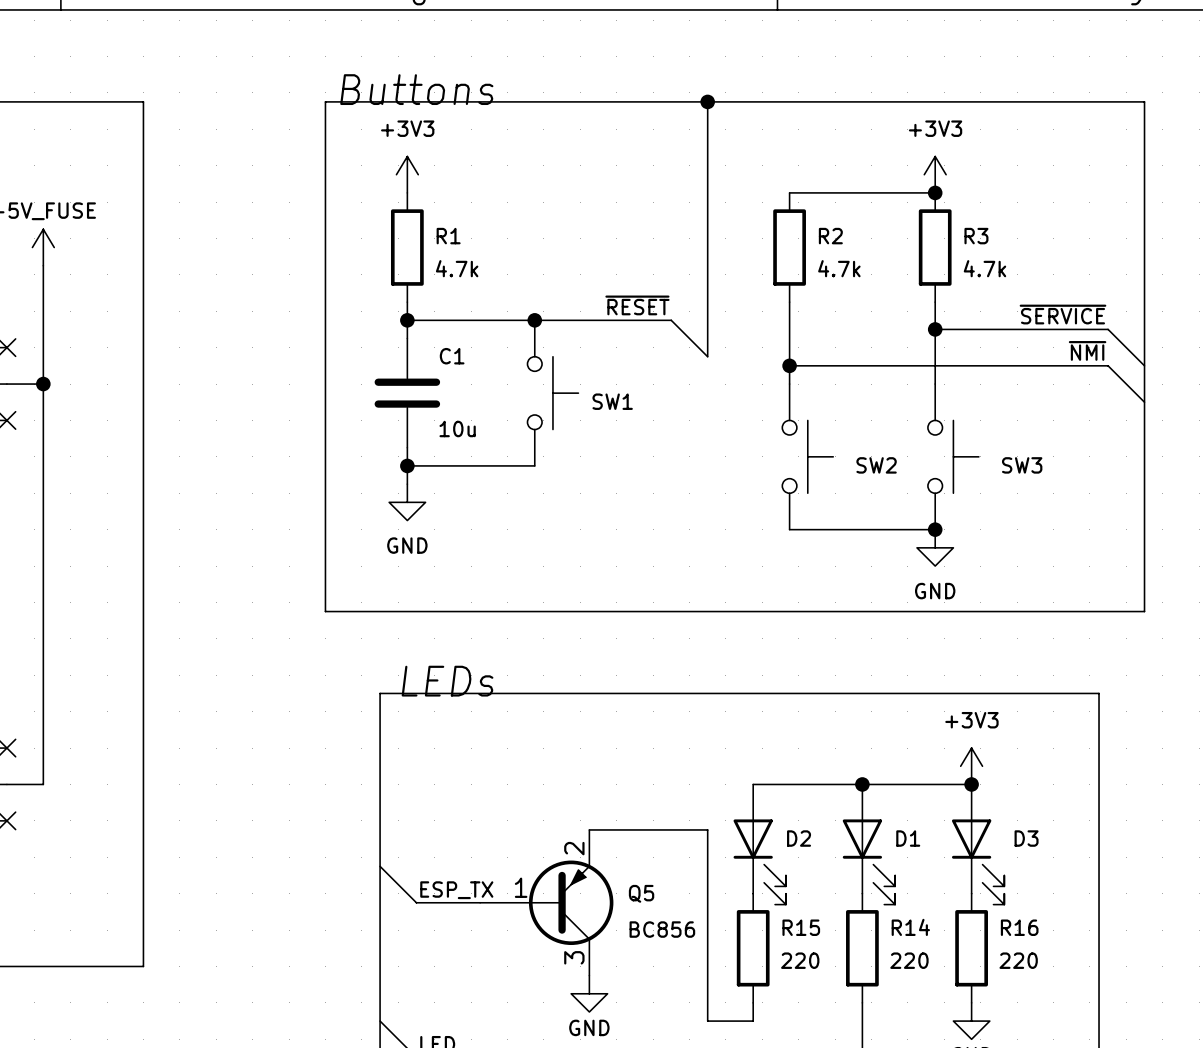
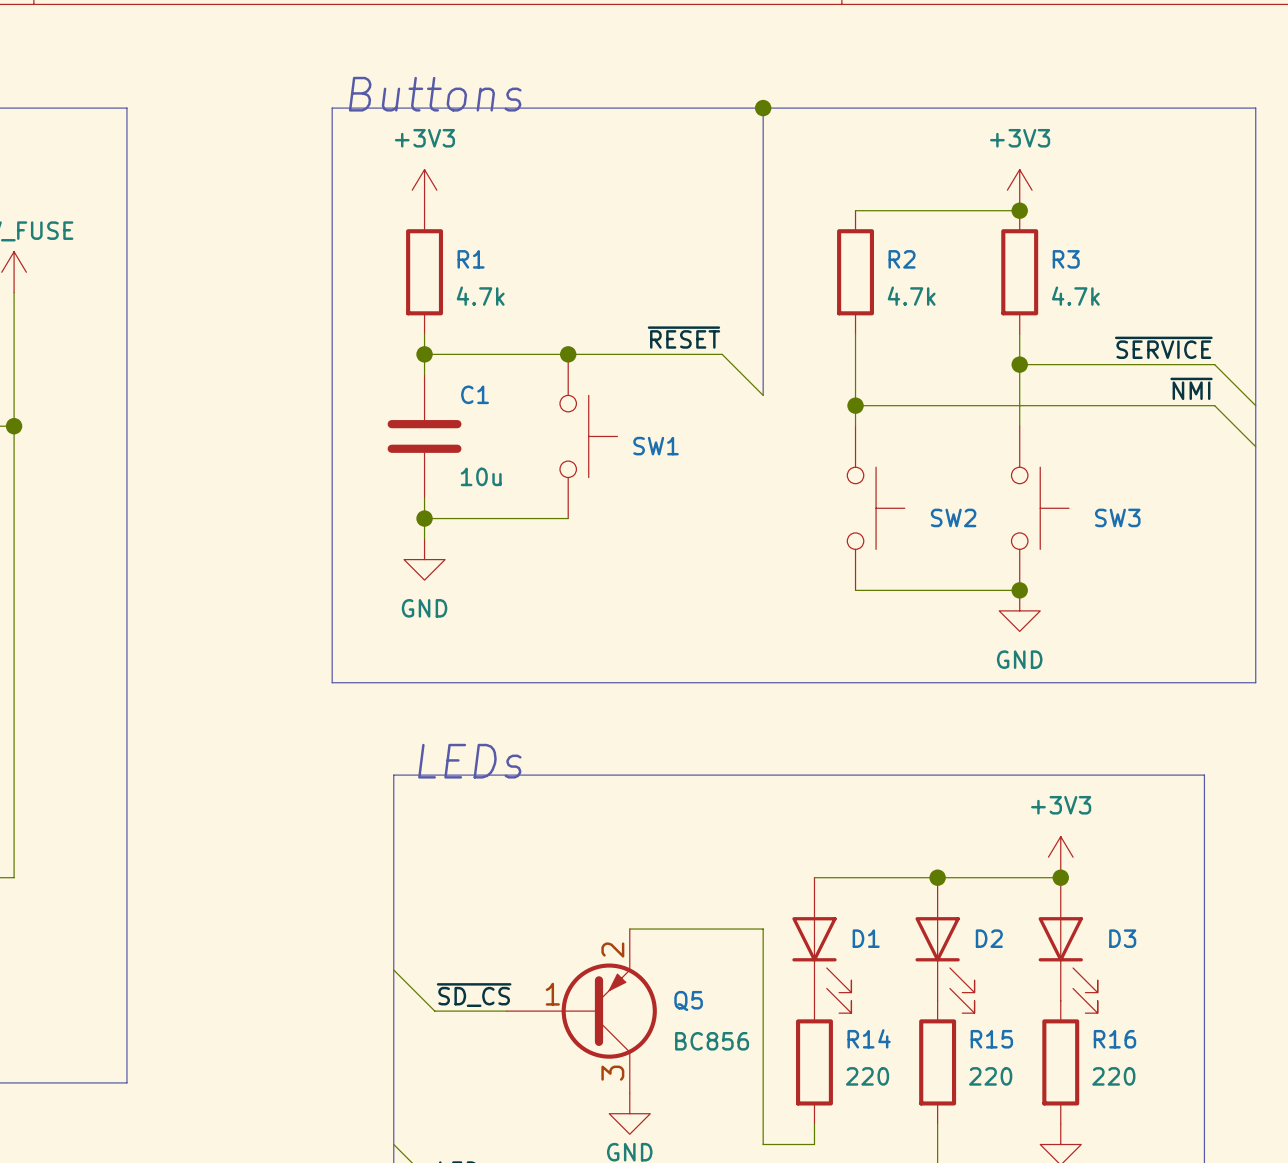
D2 name: D2 (799, 838) -> D1 (866, 938)
D1 name: D1 (908, 838) -> D2 (989, 938)
label: ESP_TX (456, 890) -> ~{SD_CS} (474, 995)
R15 name: R15 (801, 927) -> R14 (869, 1038)
R14 name: R14 (910, 927) -> R15 (991, 1039)

